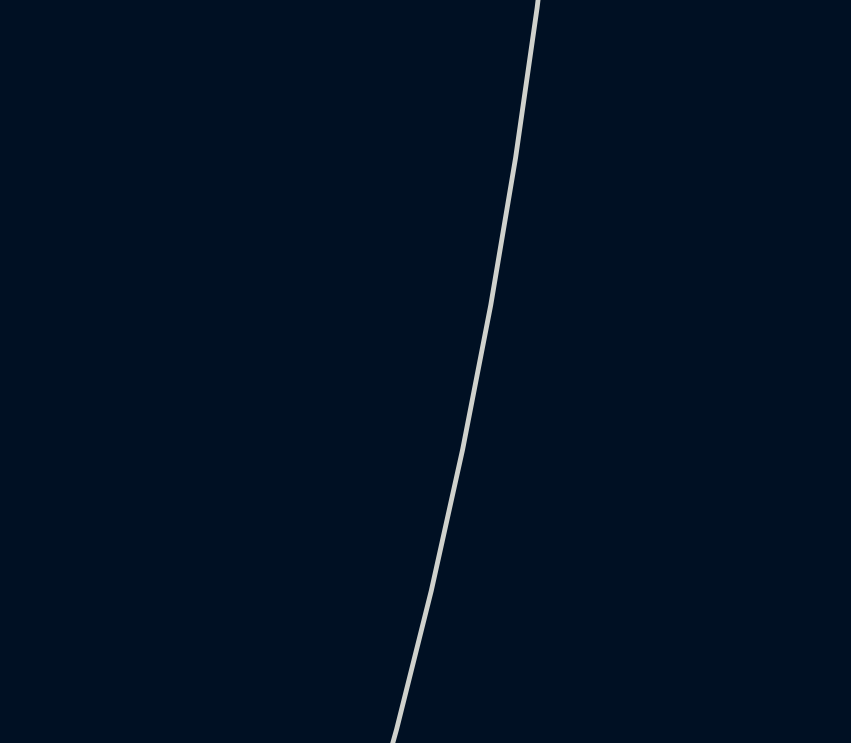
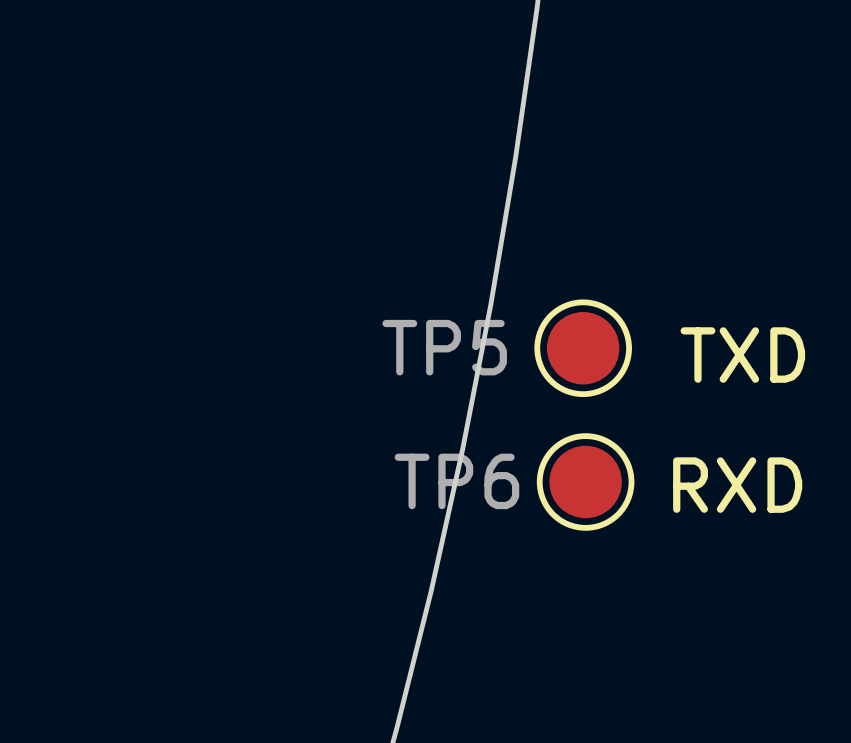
TP5: none -> TXD (583, 348)
TP6: none -> RXD (585, 481)

